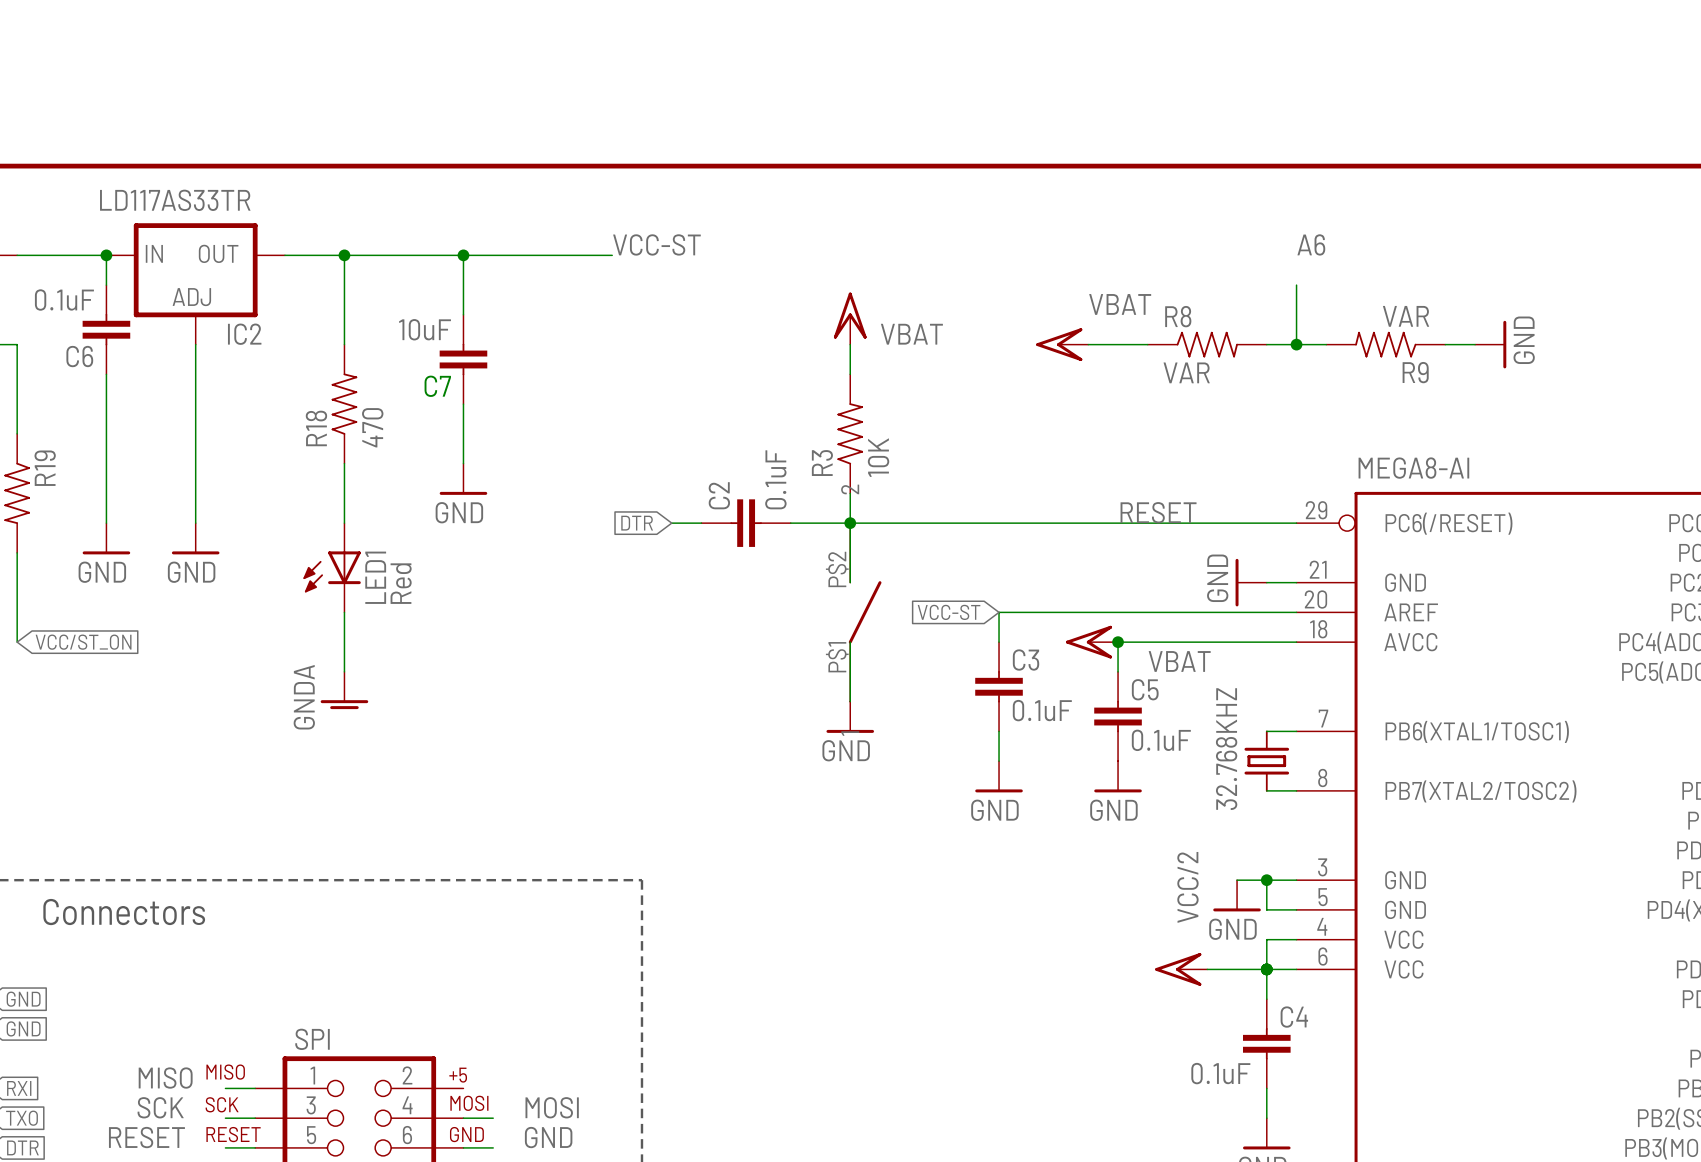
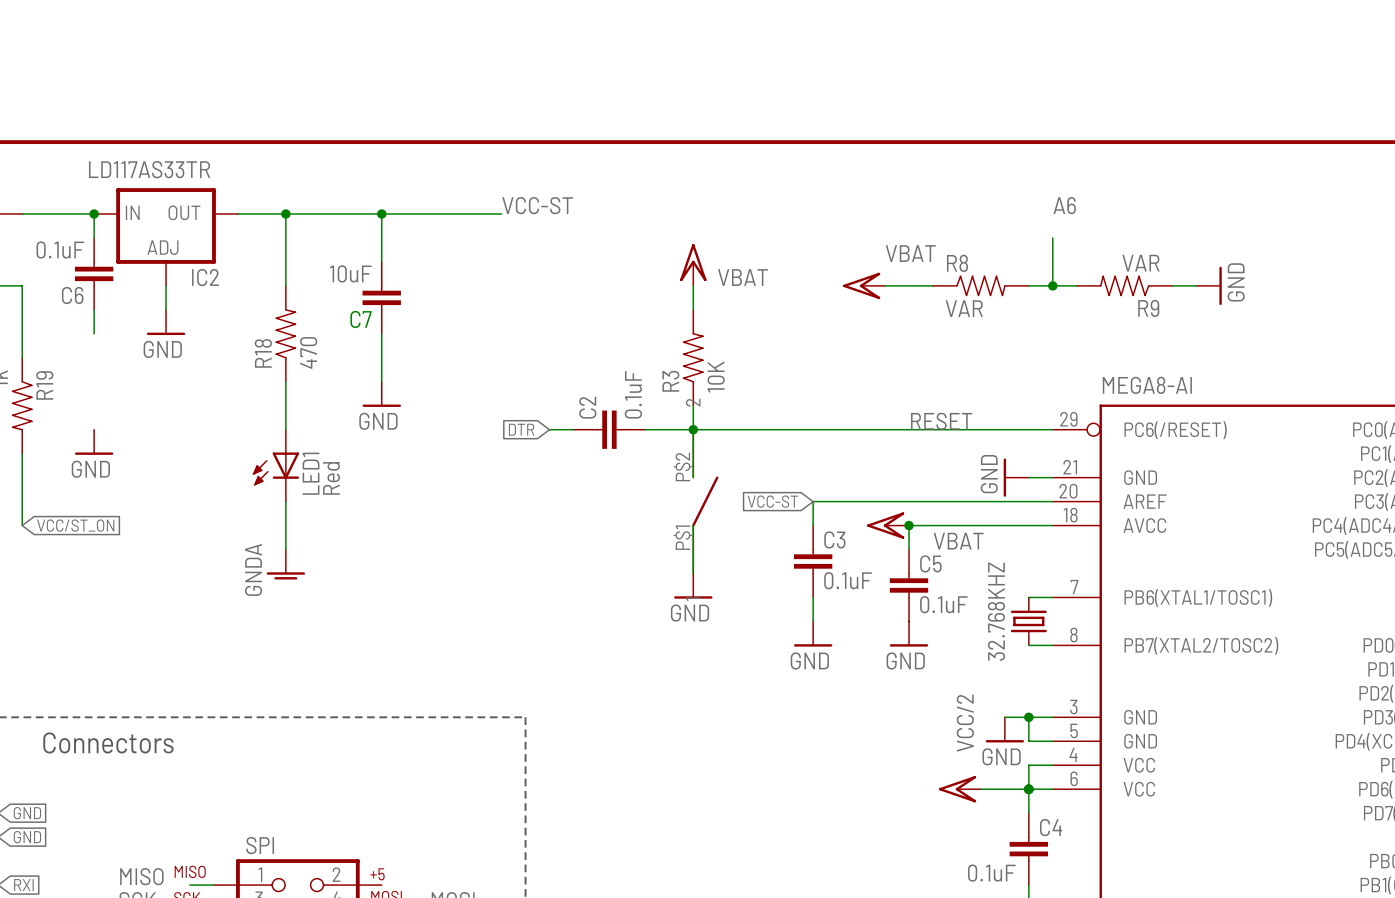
wire: (195, 374) (195, 523) -> none
wire: (106, 404) (106, 523) -> none
power symbol position: GND (195, 538) -> GND (166, 322)

